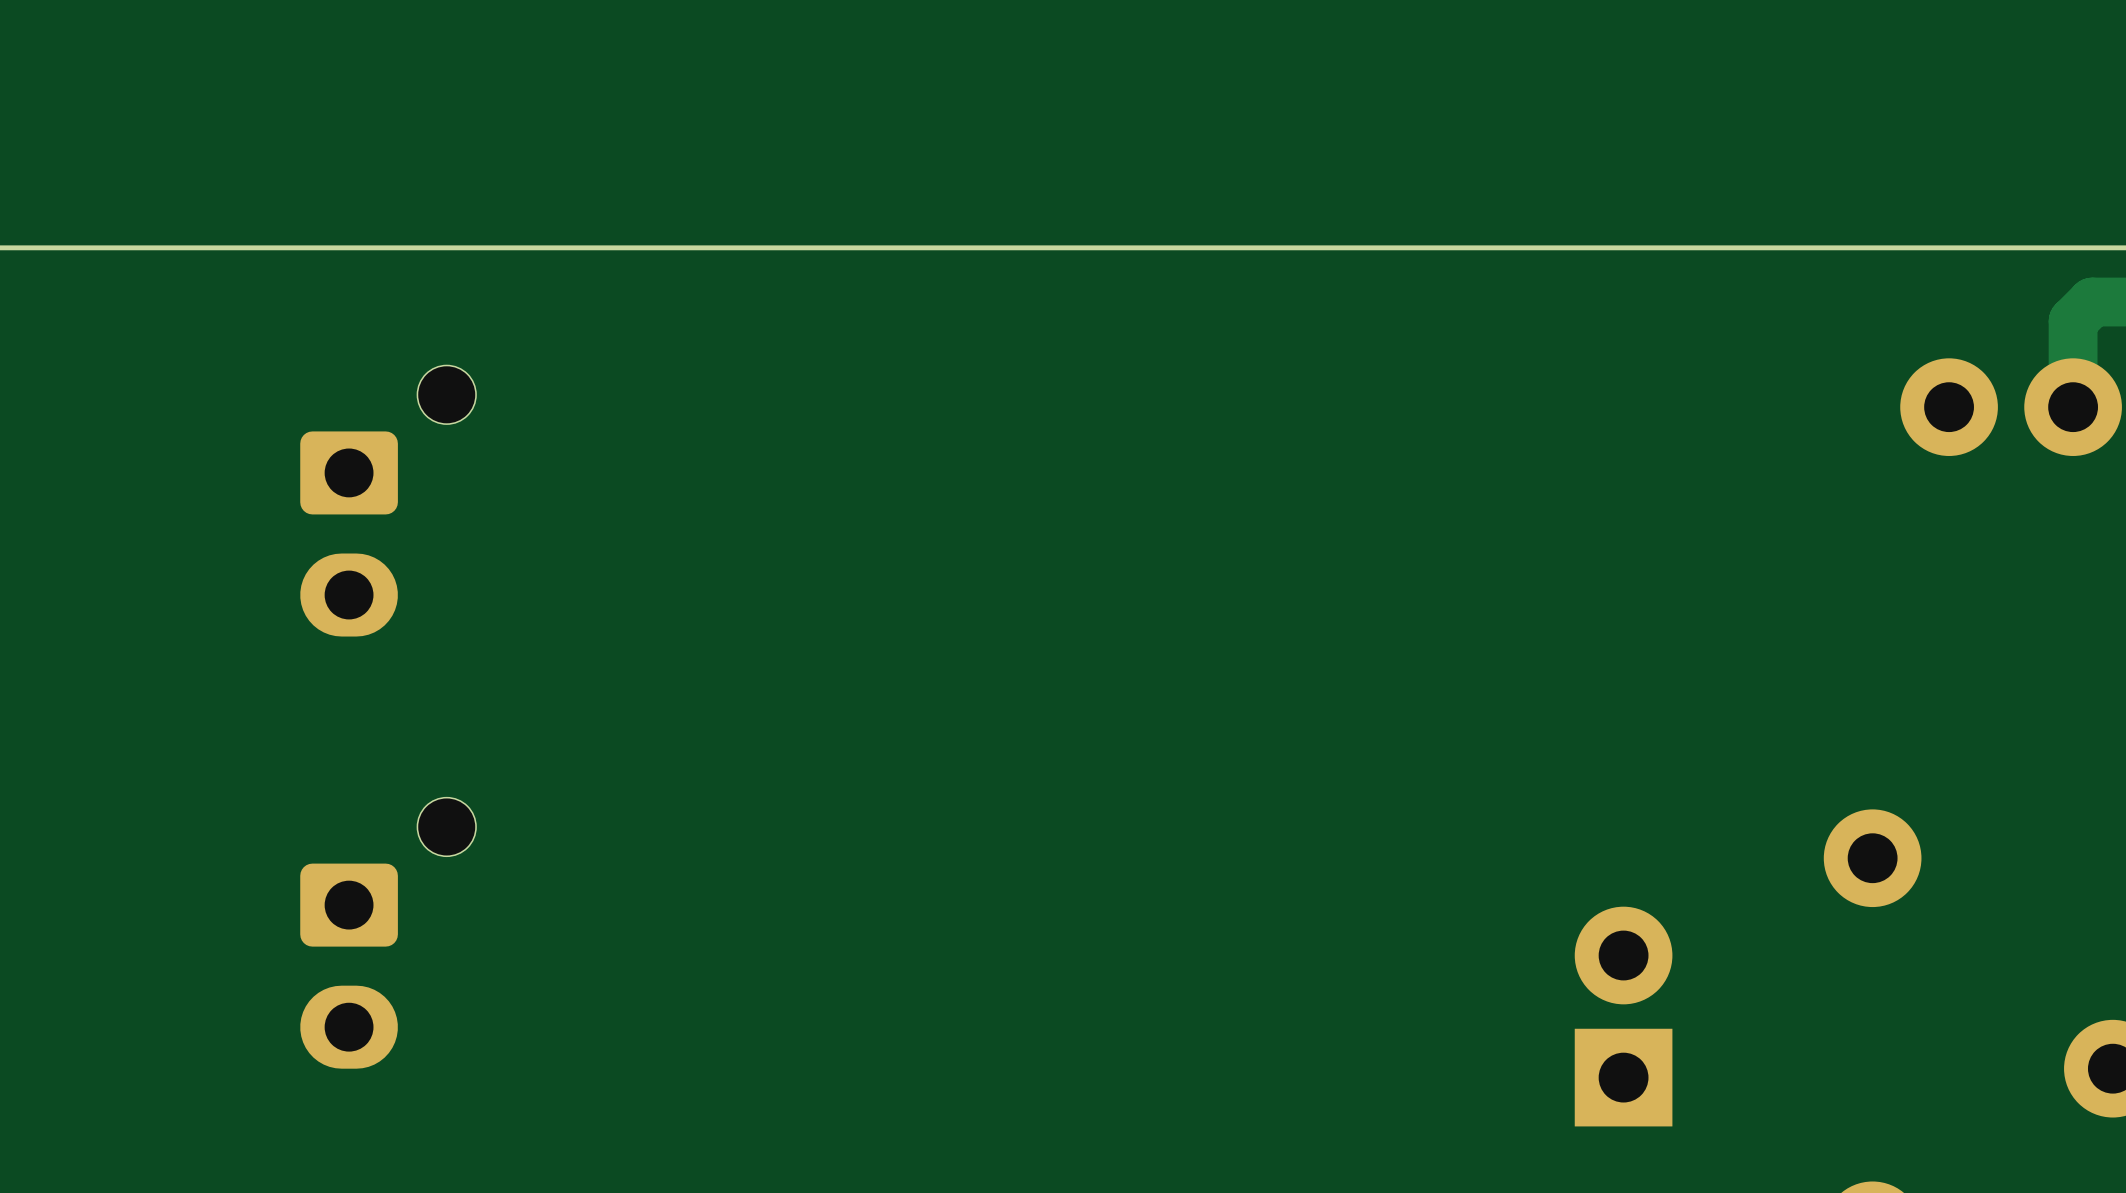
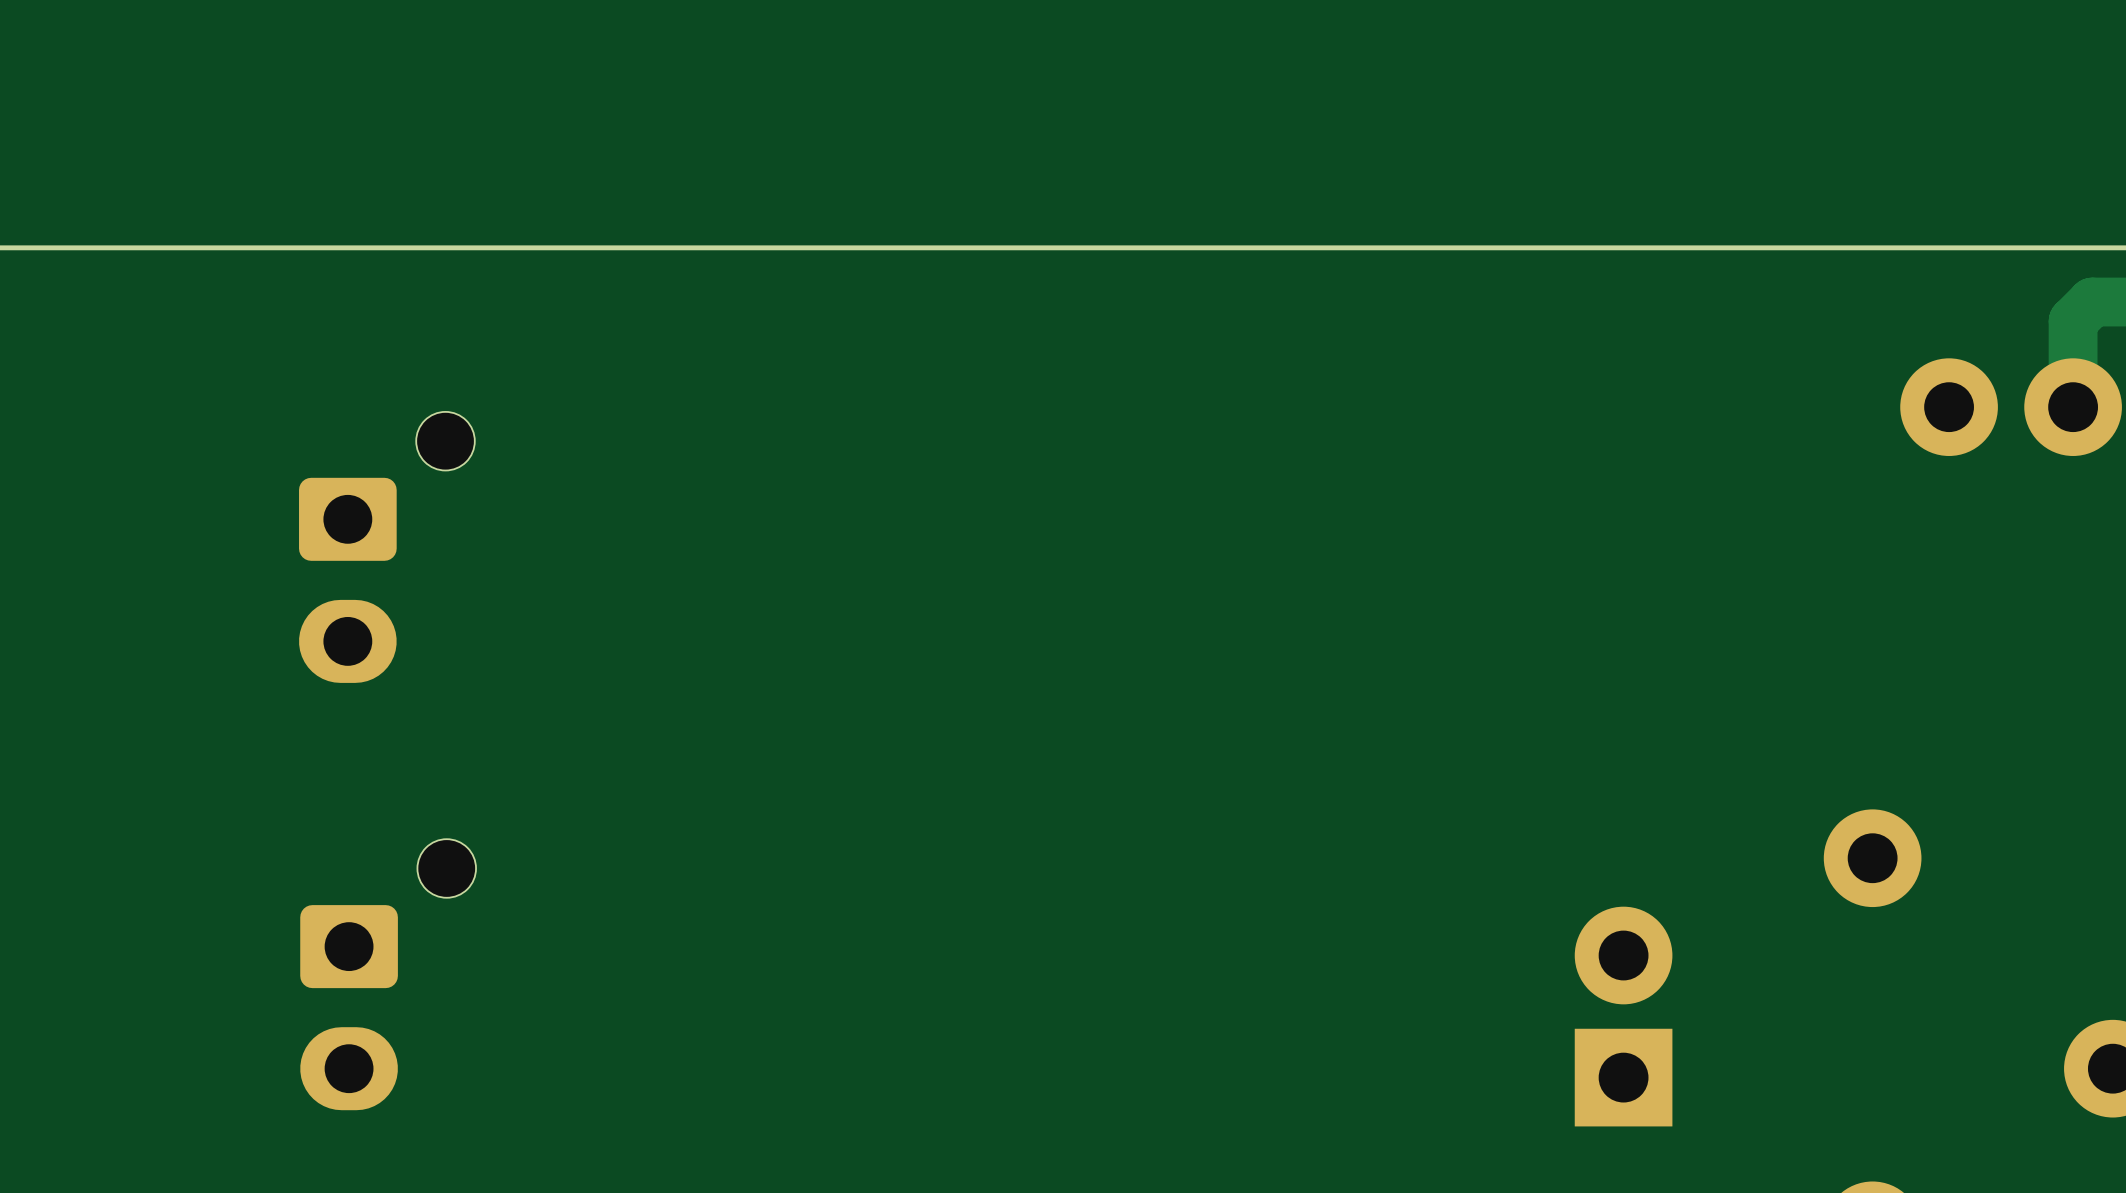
part position: (388, 501) -> (386, 547)
part position: (388, 933) -> (388, 974)

